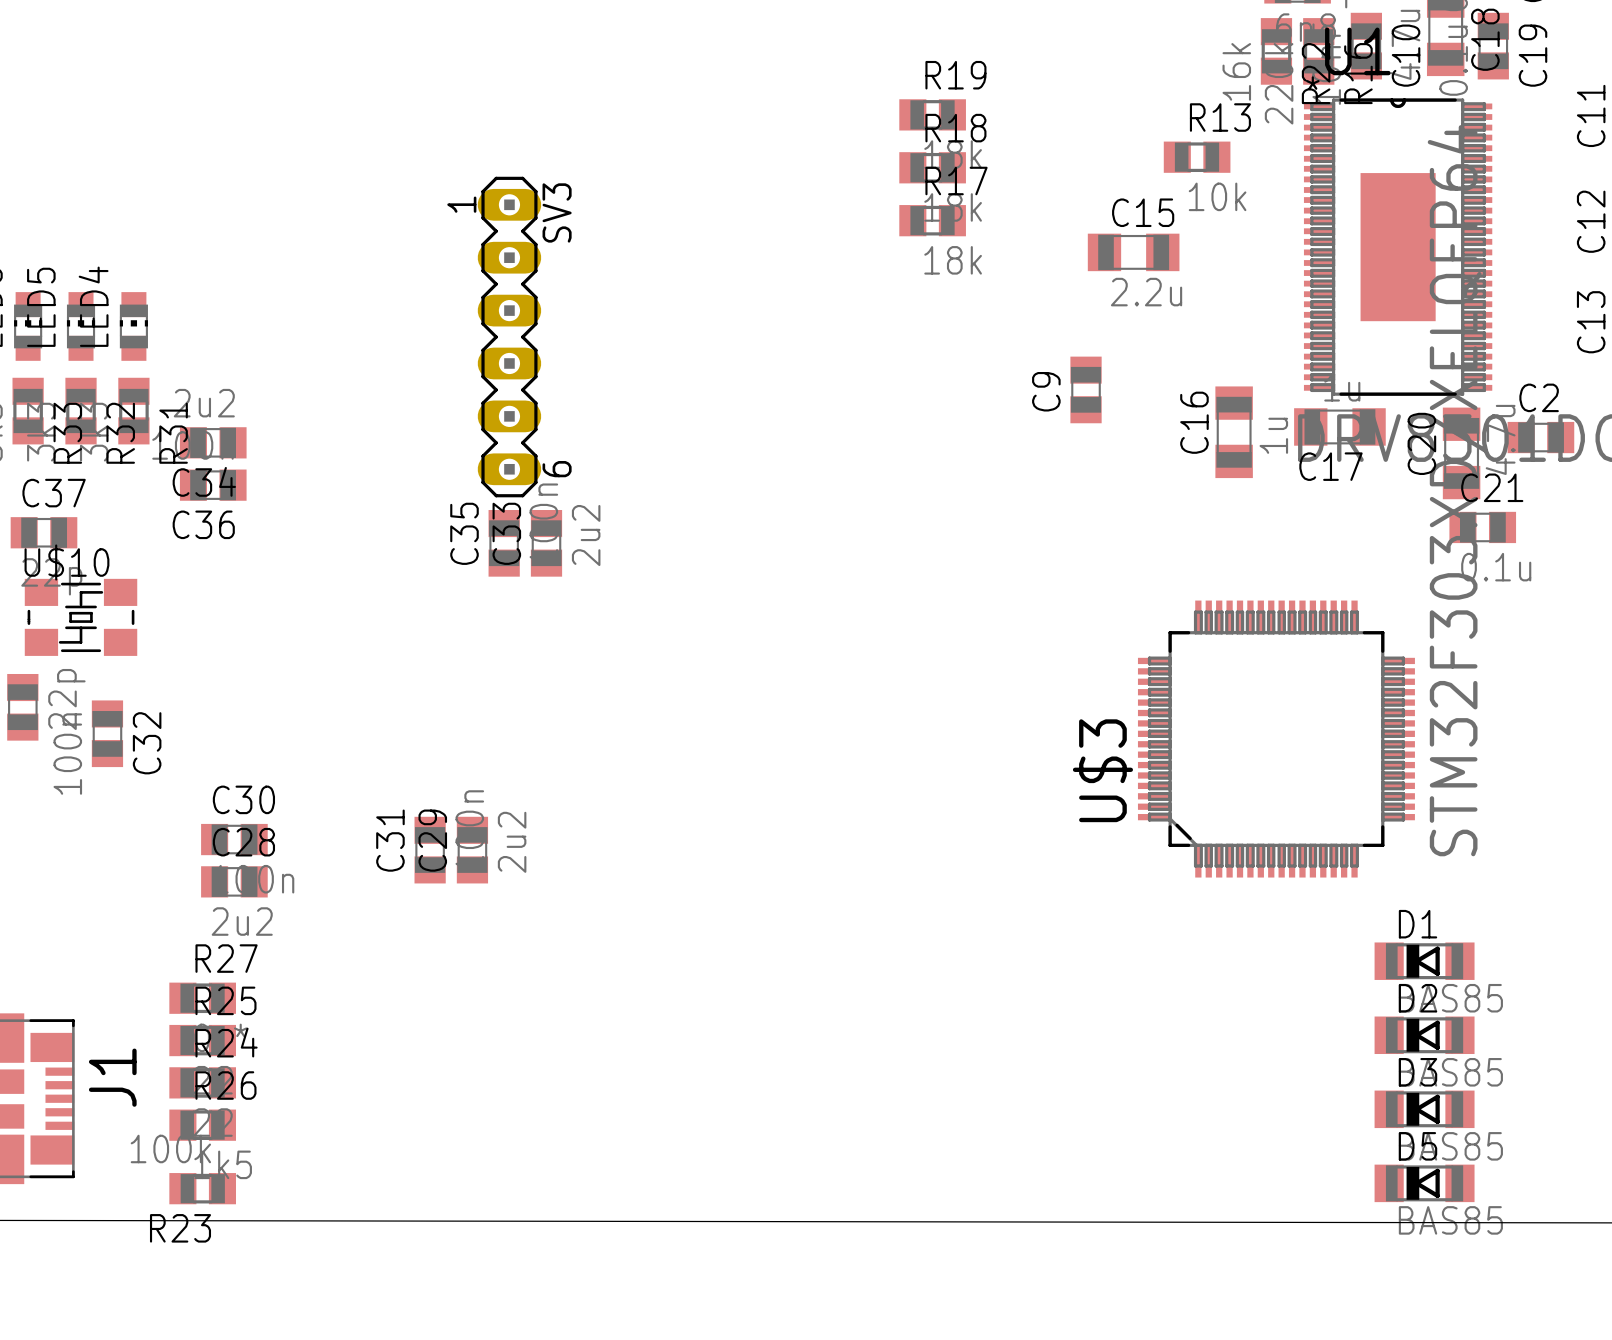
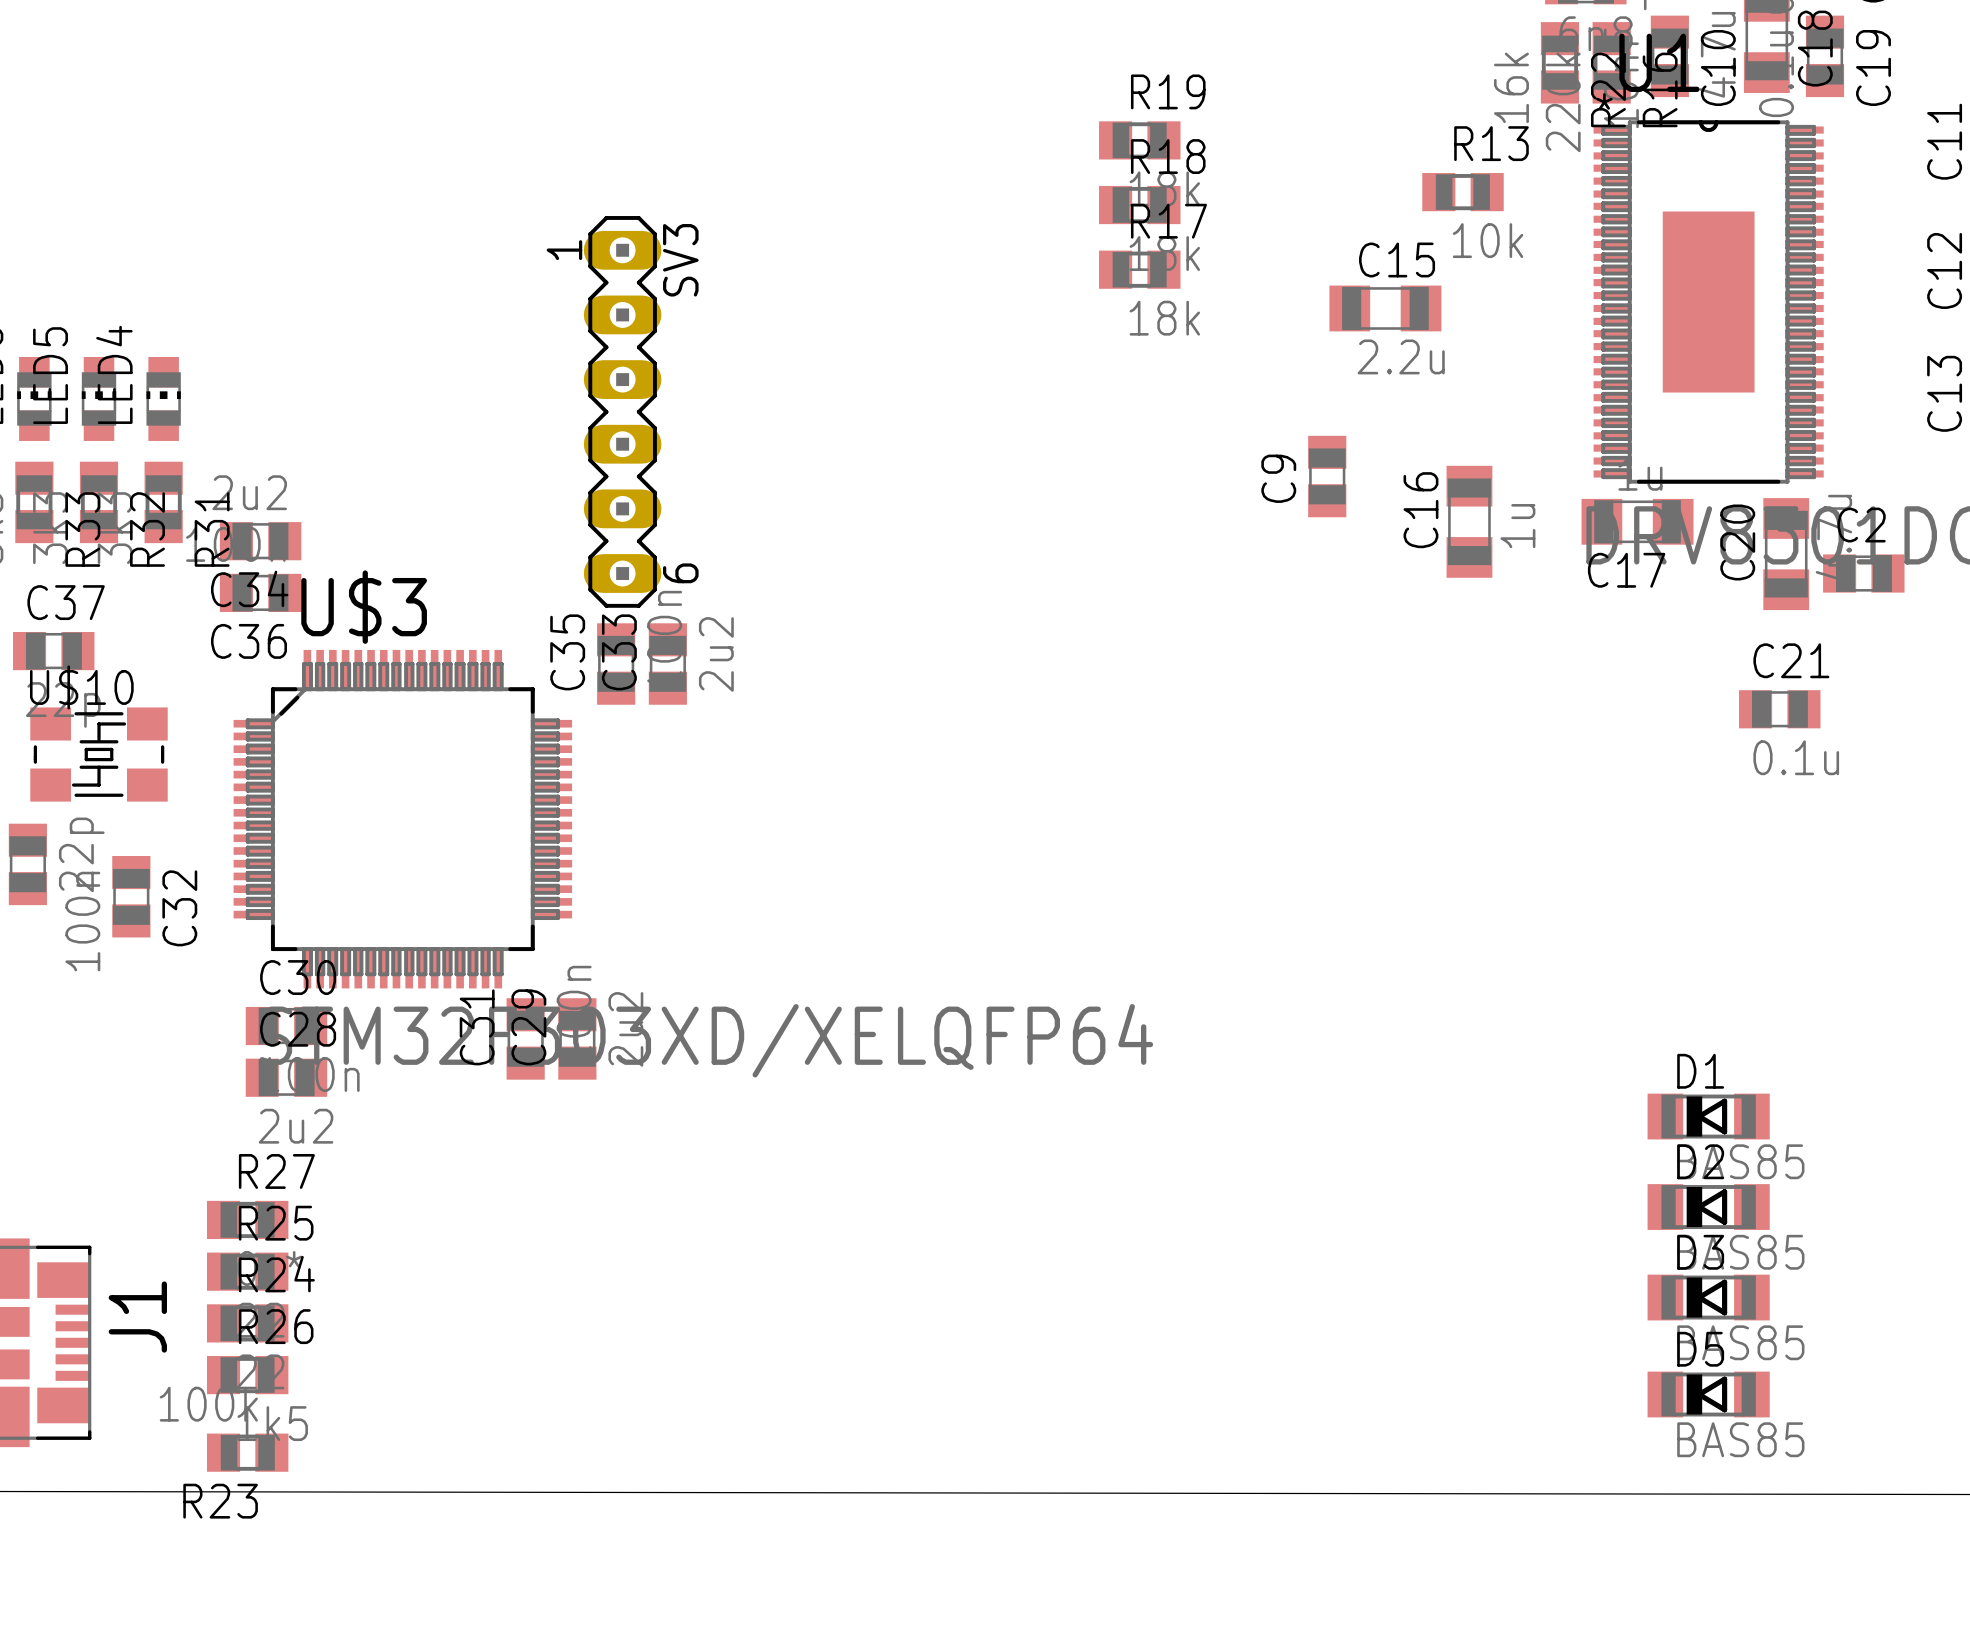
C16 position: (1234, 432) -> (1469, 521)
C2 position: (1540, 437) -> (1863, 573)
C21 position: (1482, 527) -> (1779, 709)
U$3 rotation: 0° (1276, 739) -> 90° clockwise (402, 819)
U$3 position: (1276, 739) -> (402, 819)
D1 position: (1424, 961) -> (1708, 1116)
D2 position: (1424, 1035) -> (1708, 1207)
D3 position: (1424, 1109) -> (1708, 1297)
D5 position: (1424, 1183) -> (1708, 1394)

